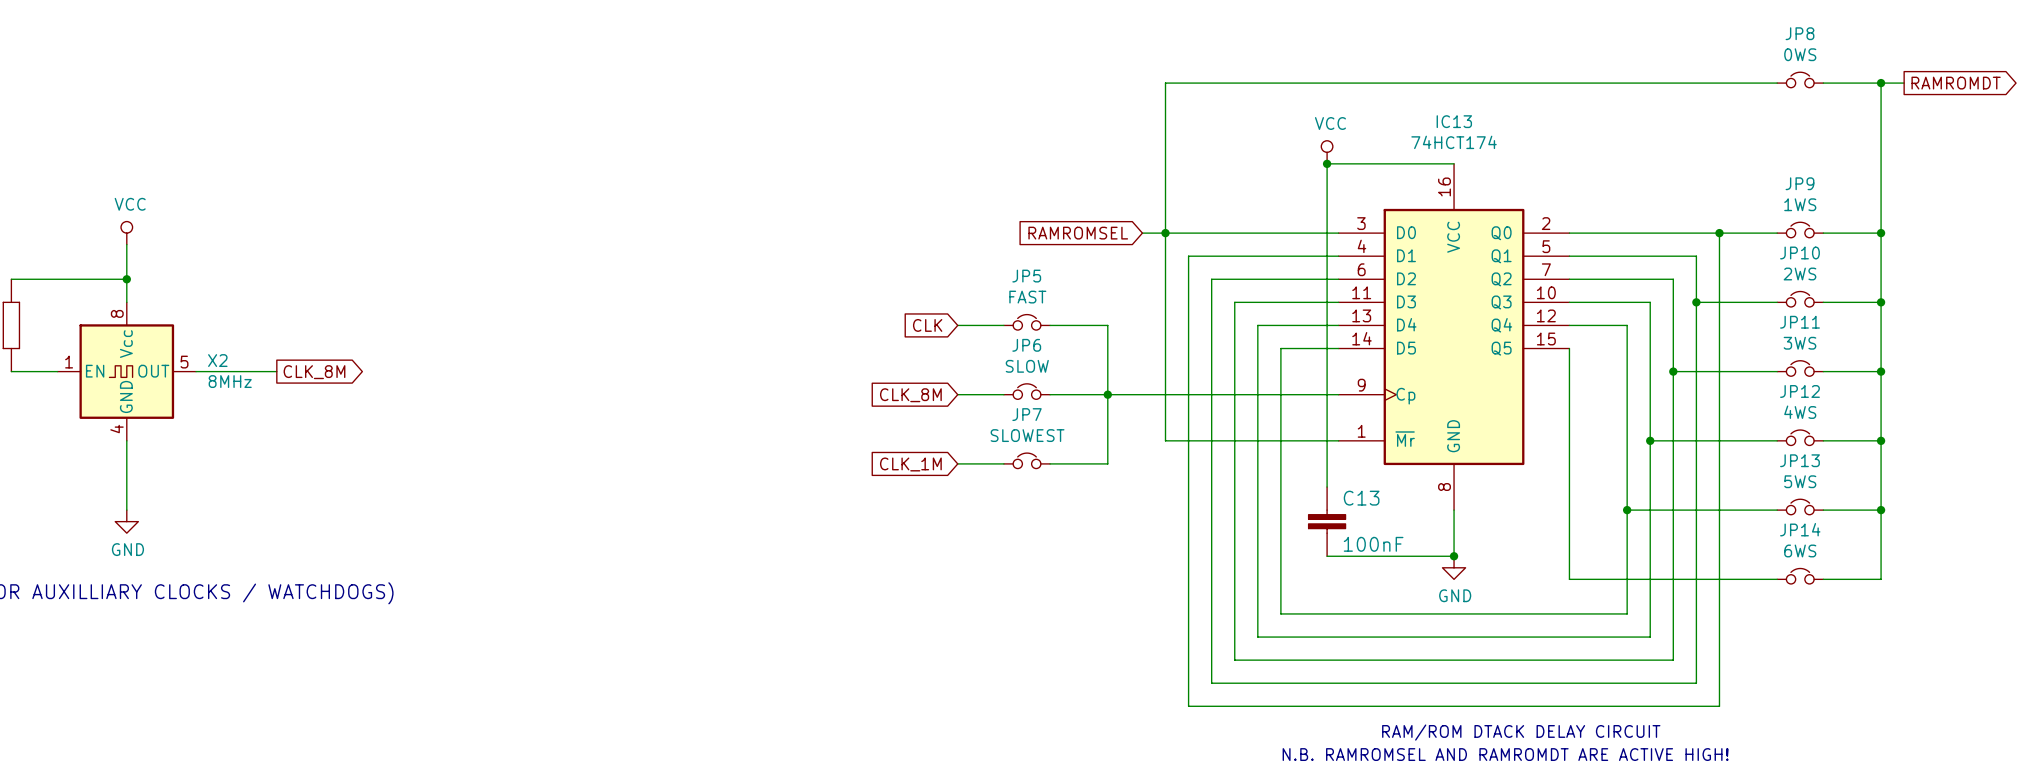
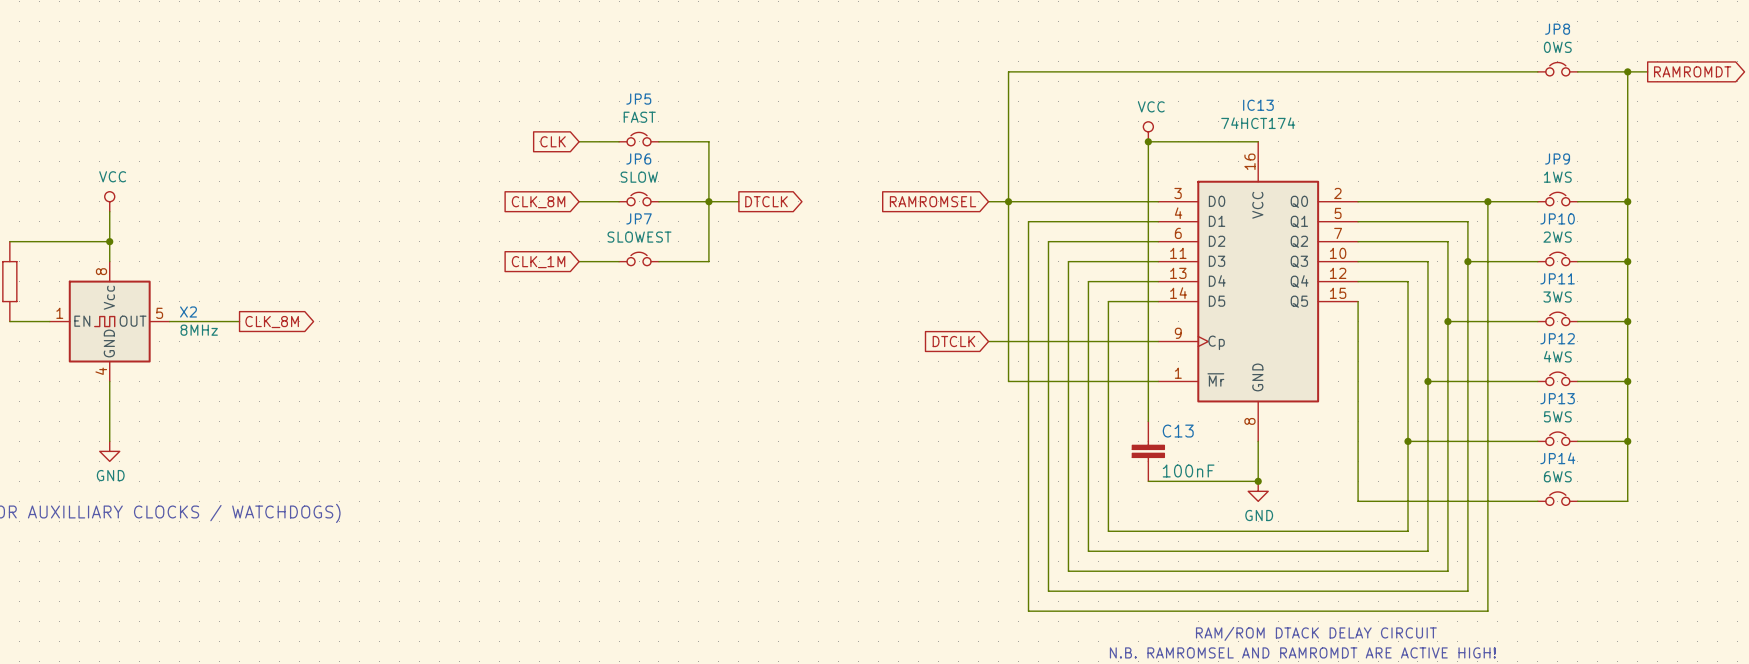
global label: none -> CLK (553, 141)
wire: none -> (579, 141) (619, 141)
wire: none -> (658, 141) (708, 141) (708, 261) (658, 261)
global label: none -> CLK_8M (538, 202)
wire: none -> (579, 201) (619, 201)
wire: none -> (658, 201) (738, 201)
junction: none -> (708, 201)
global label: none -> DTCLK (766, 201)
global label: none -> CLK_1M (538, 262)
wire: none -> (579, 261) (619, 261)
JP5 position: (1027, 322) -> (639, 139)
global label: CLK (927, 325) -> none
wire: (957, 325) (1003, 325) -> none
wire: (1050, 325) (1107, 325) (1107, 463) (1050, 463) -> none
JP6 position: (1027, 391) -> (639, 199)
wire: (957, 394) (1003, 394) -> none
wire: (1050, 394) (1142, 394) -> none
global label: none -> DTCLK (953, 341)
junction: (1107, 394) -> none
global label: CLK_8M (910, 395) -> none
JP7 position: (1027, 460) -> (639, 258)
wire: (957, 463) (1003, 463) -> none
global label: CLK_1M (910, 464) -> none

